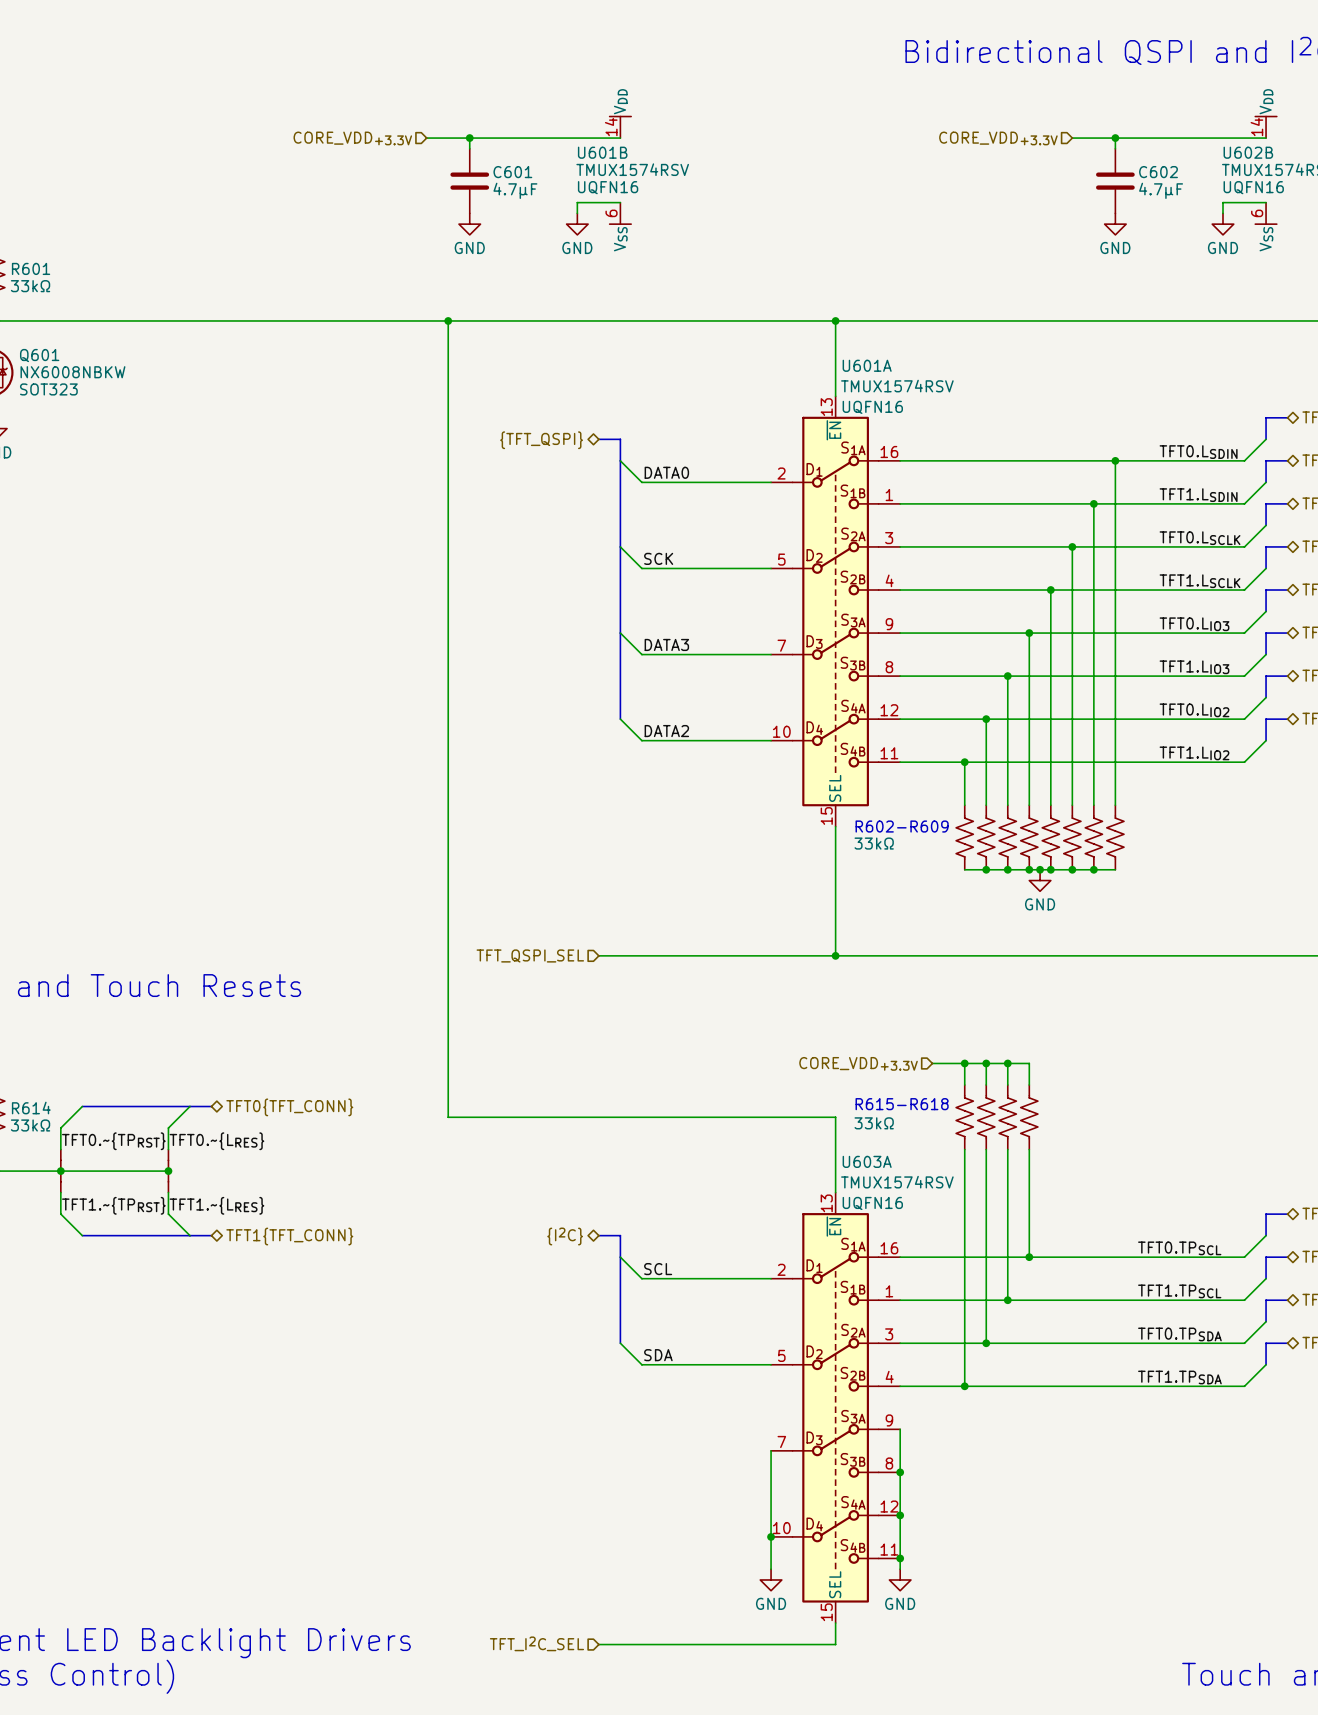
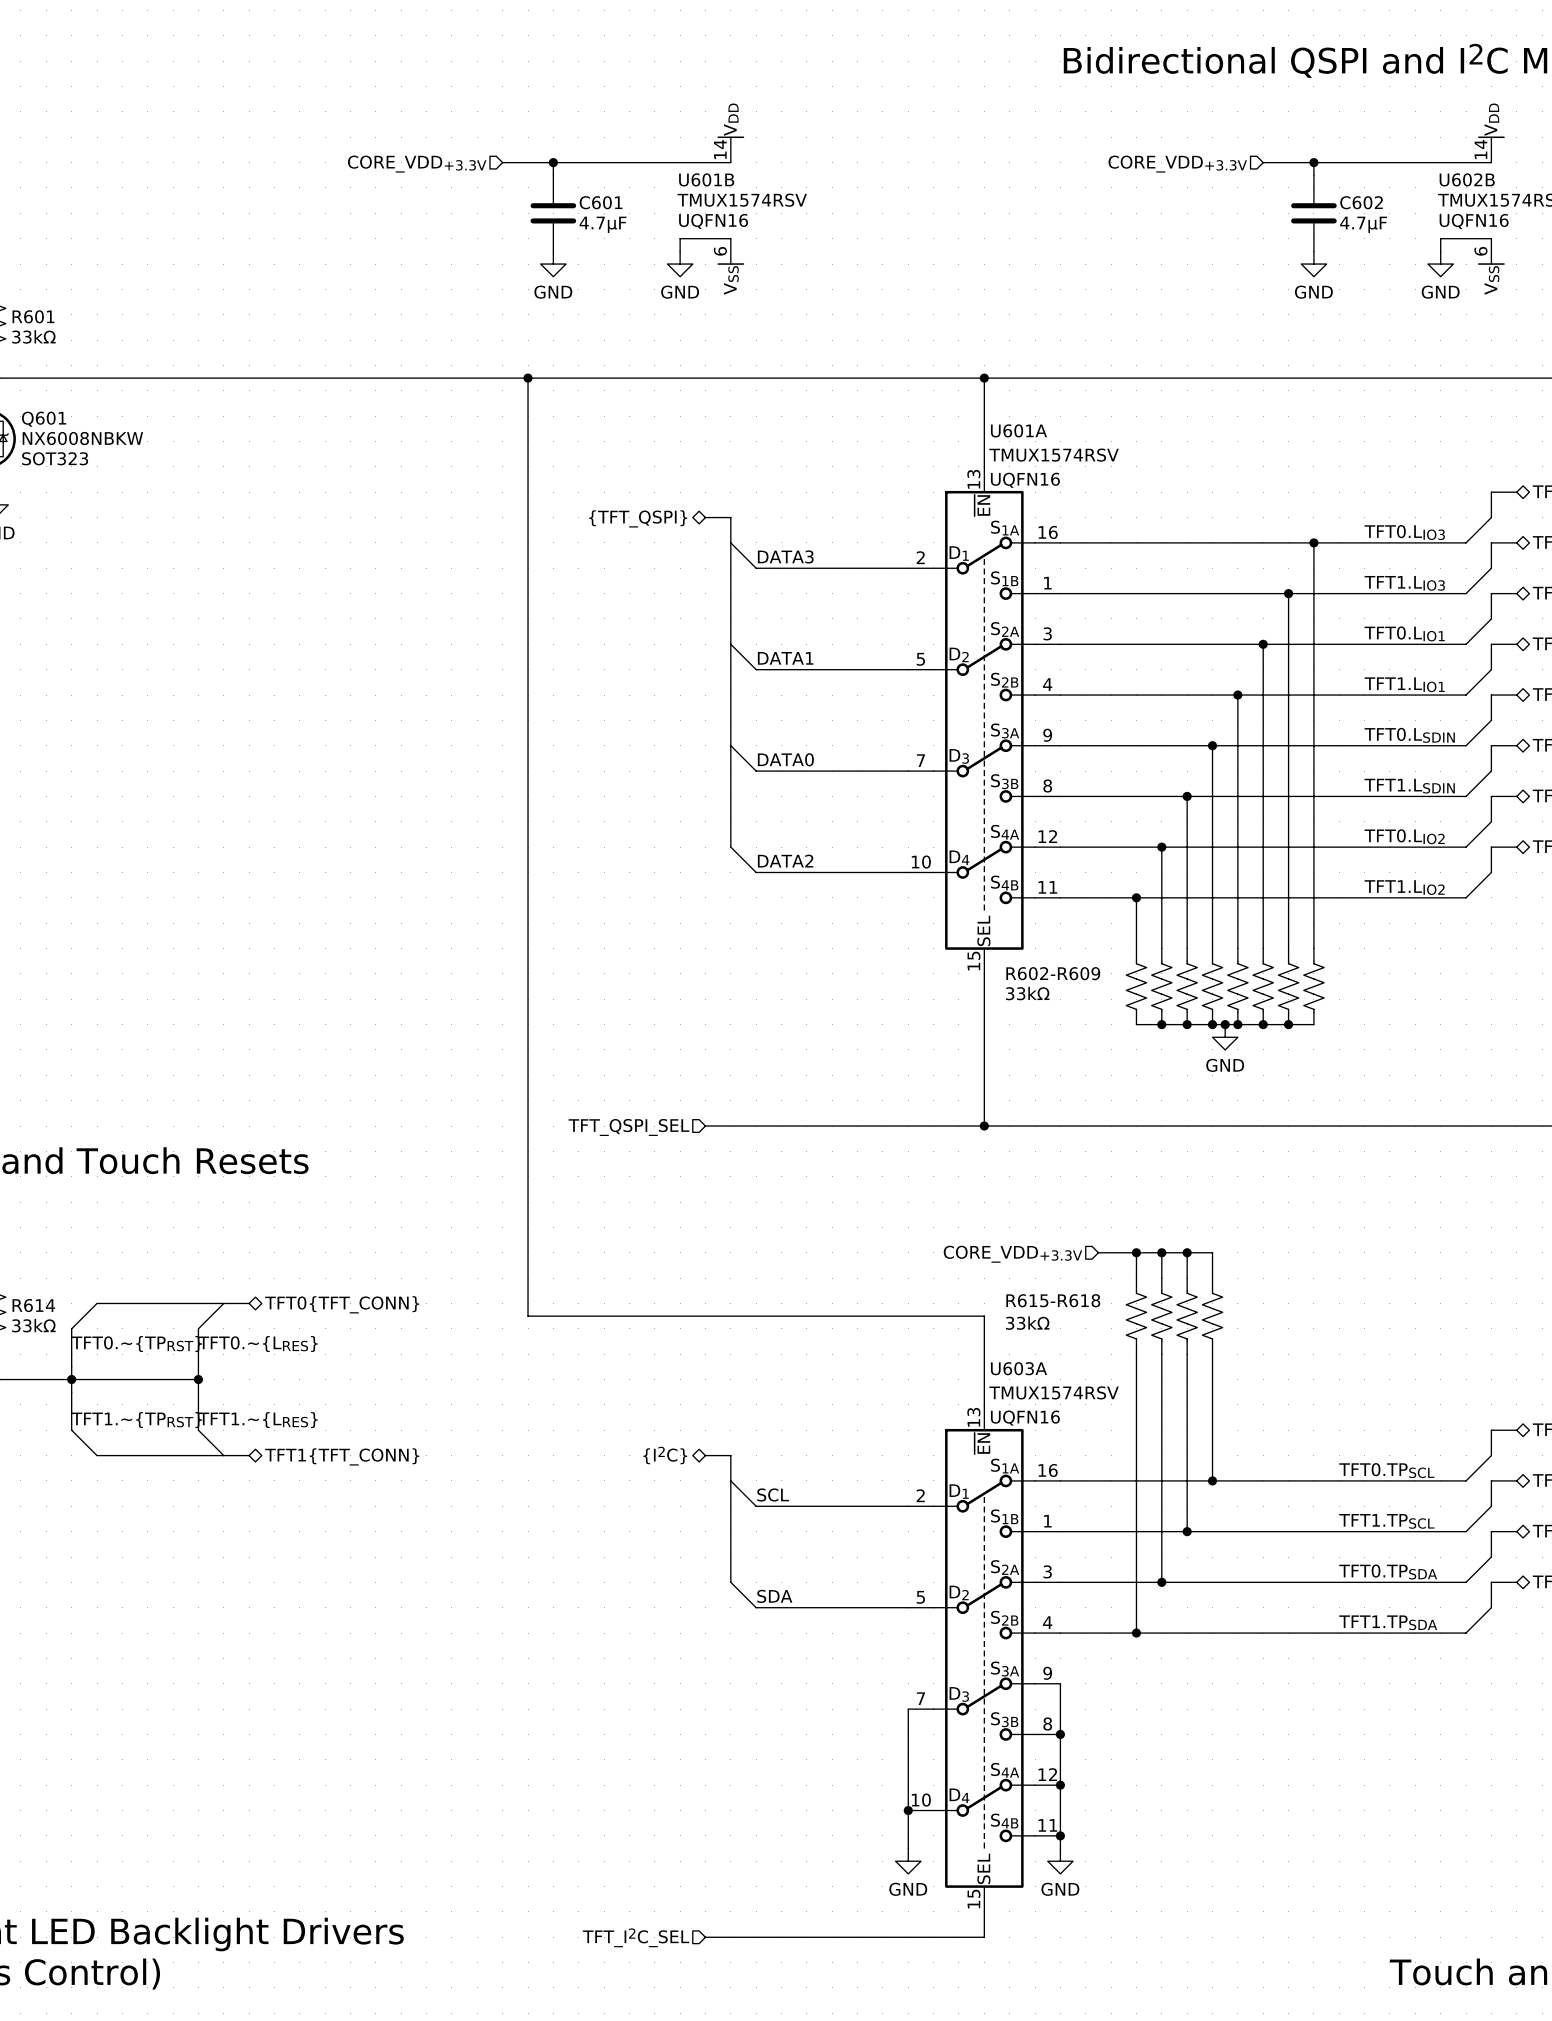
label: TFT0.LSDIN (1198, 452) -> TFT0.LIO3 (1404, 532)
label: DATA0 (666, 472) -> DATA3 (785, 556)
label: TFT1.LSDIN (1198, 495) -> TFT1.LIO3 (1404, 583)
label: TFT0.LSCLK (1200, 538) -> TFT0.LIO1 (1404, 633)
label: SCK (658, 558) -> DATA1 (785, 658)
label: TFT1.LSCLK (1200, 581) -> TFT1.LIO1 (1404, 684)
label: TFT0.LIO3 (1194, 624) -> TFT0.LSDIN (1409, 735)
label: DATA3 (666, 644) -> DATA0 (785, 759)
label: TFT1.LIO3 (1194, 667) -> TFT1.LSDIN (1409, 786)

